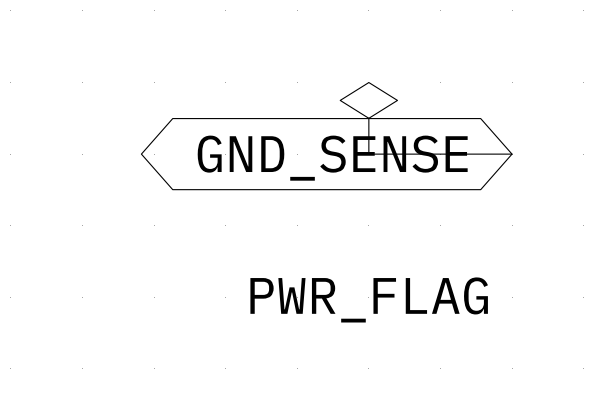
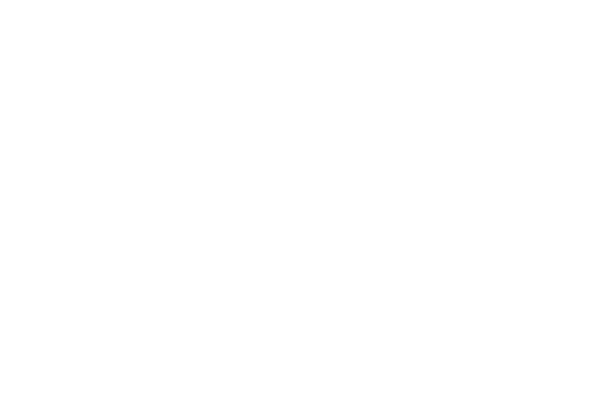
power symbol: PWR_FLAG (368, 118) -> none
wire: (368, 154) (512, 154) -> none
global label: GND_SENSE (332, 158) -> none

